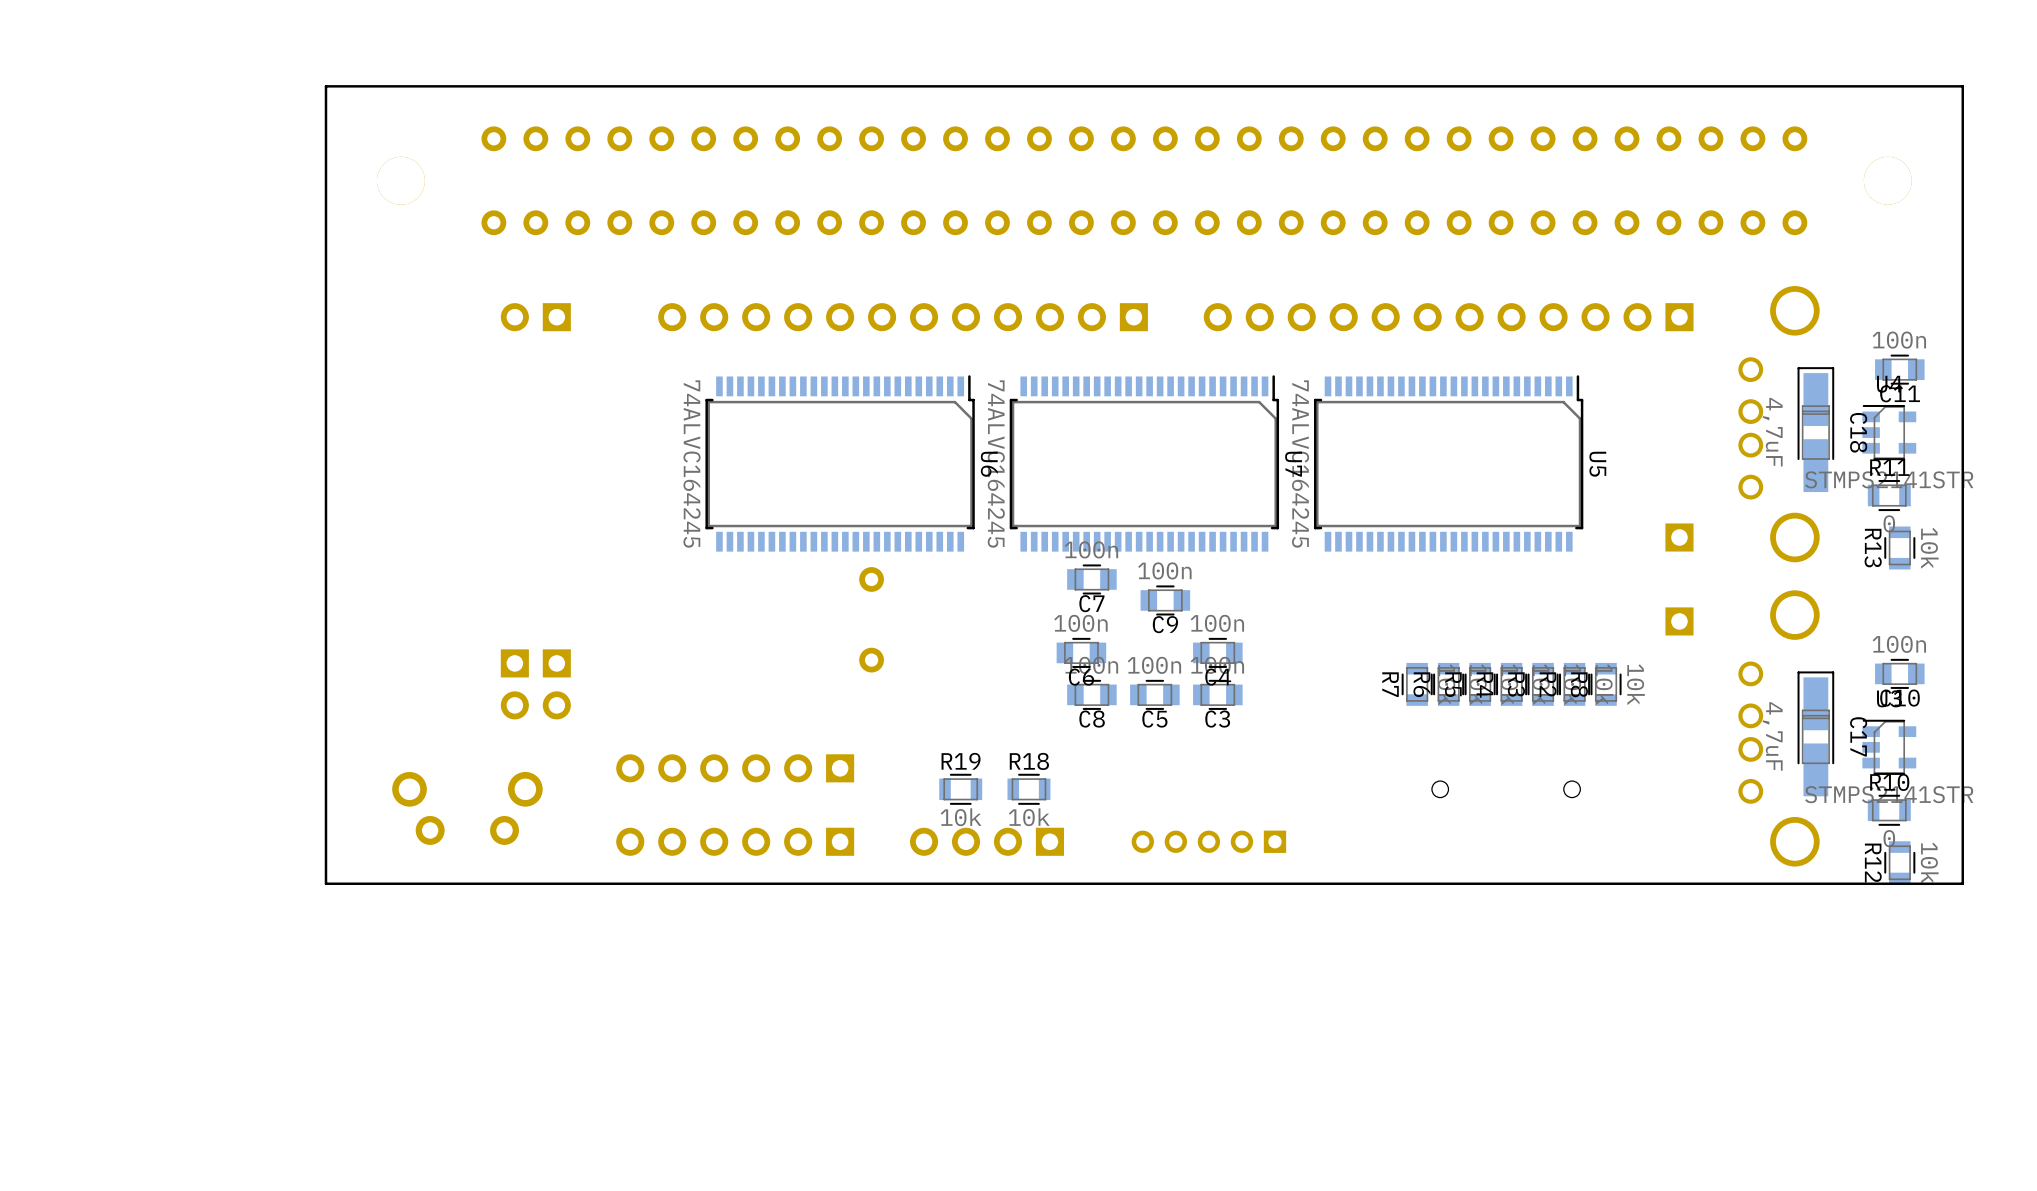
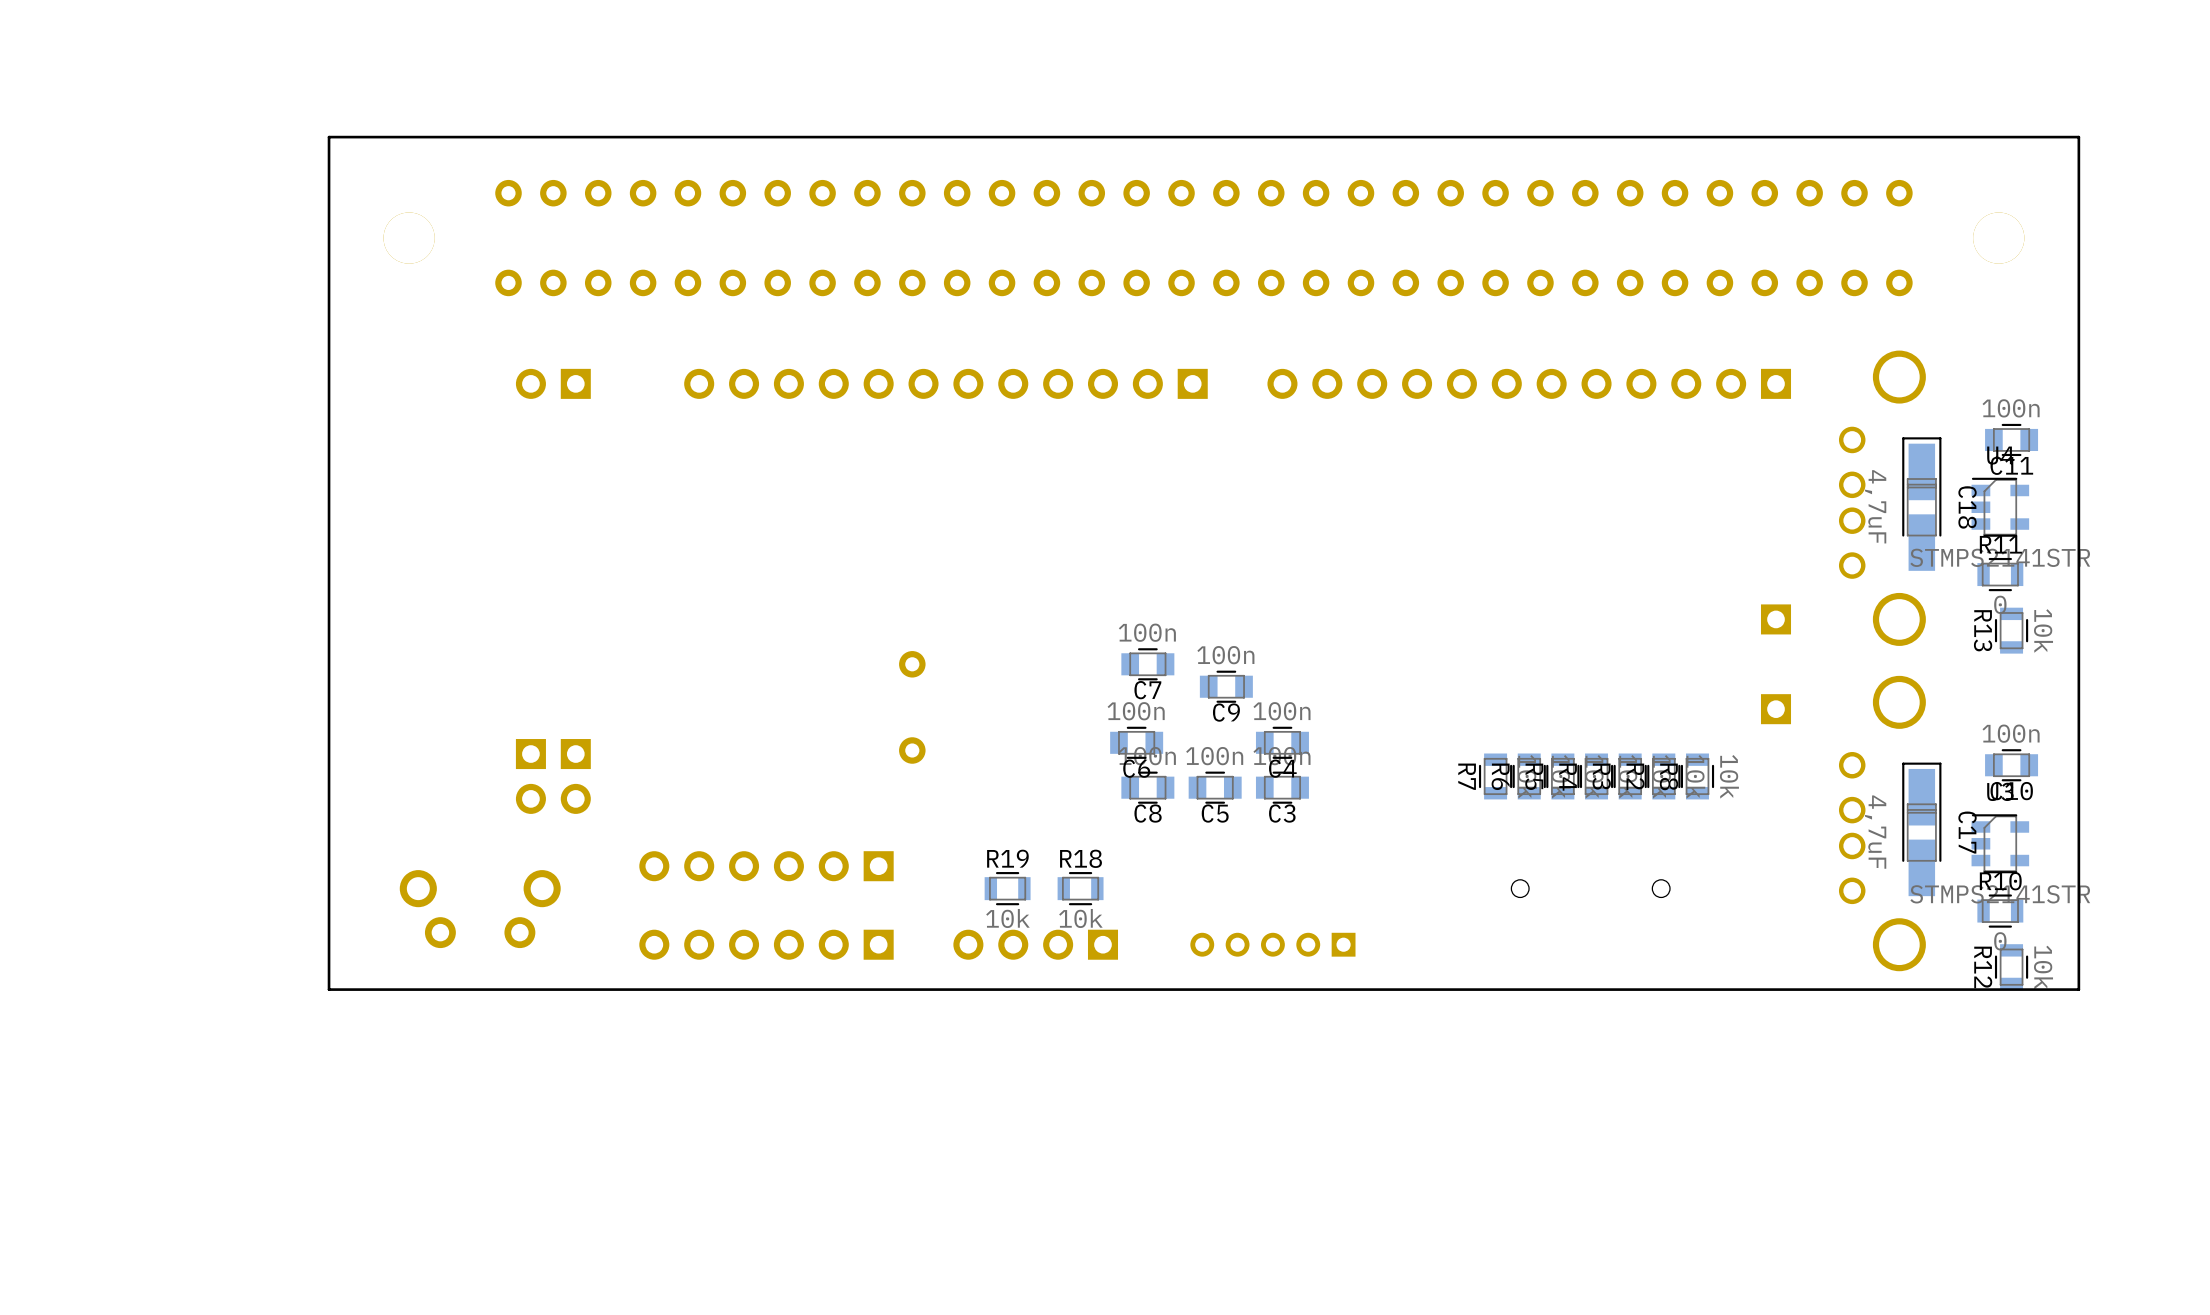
U6: 74ALVC164245 (840, 463) -> none
U7: 74ALVC164245 (1144, 463) -> none
U5: 74ALVC164245 (1448, 463) -> none

